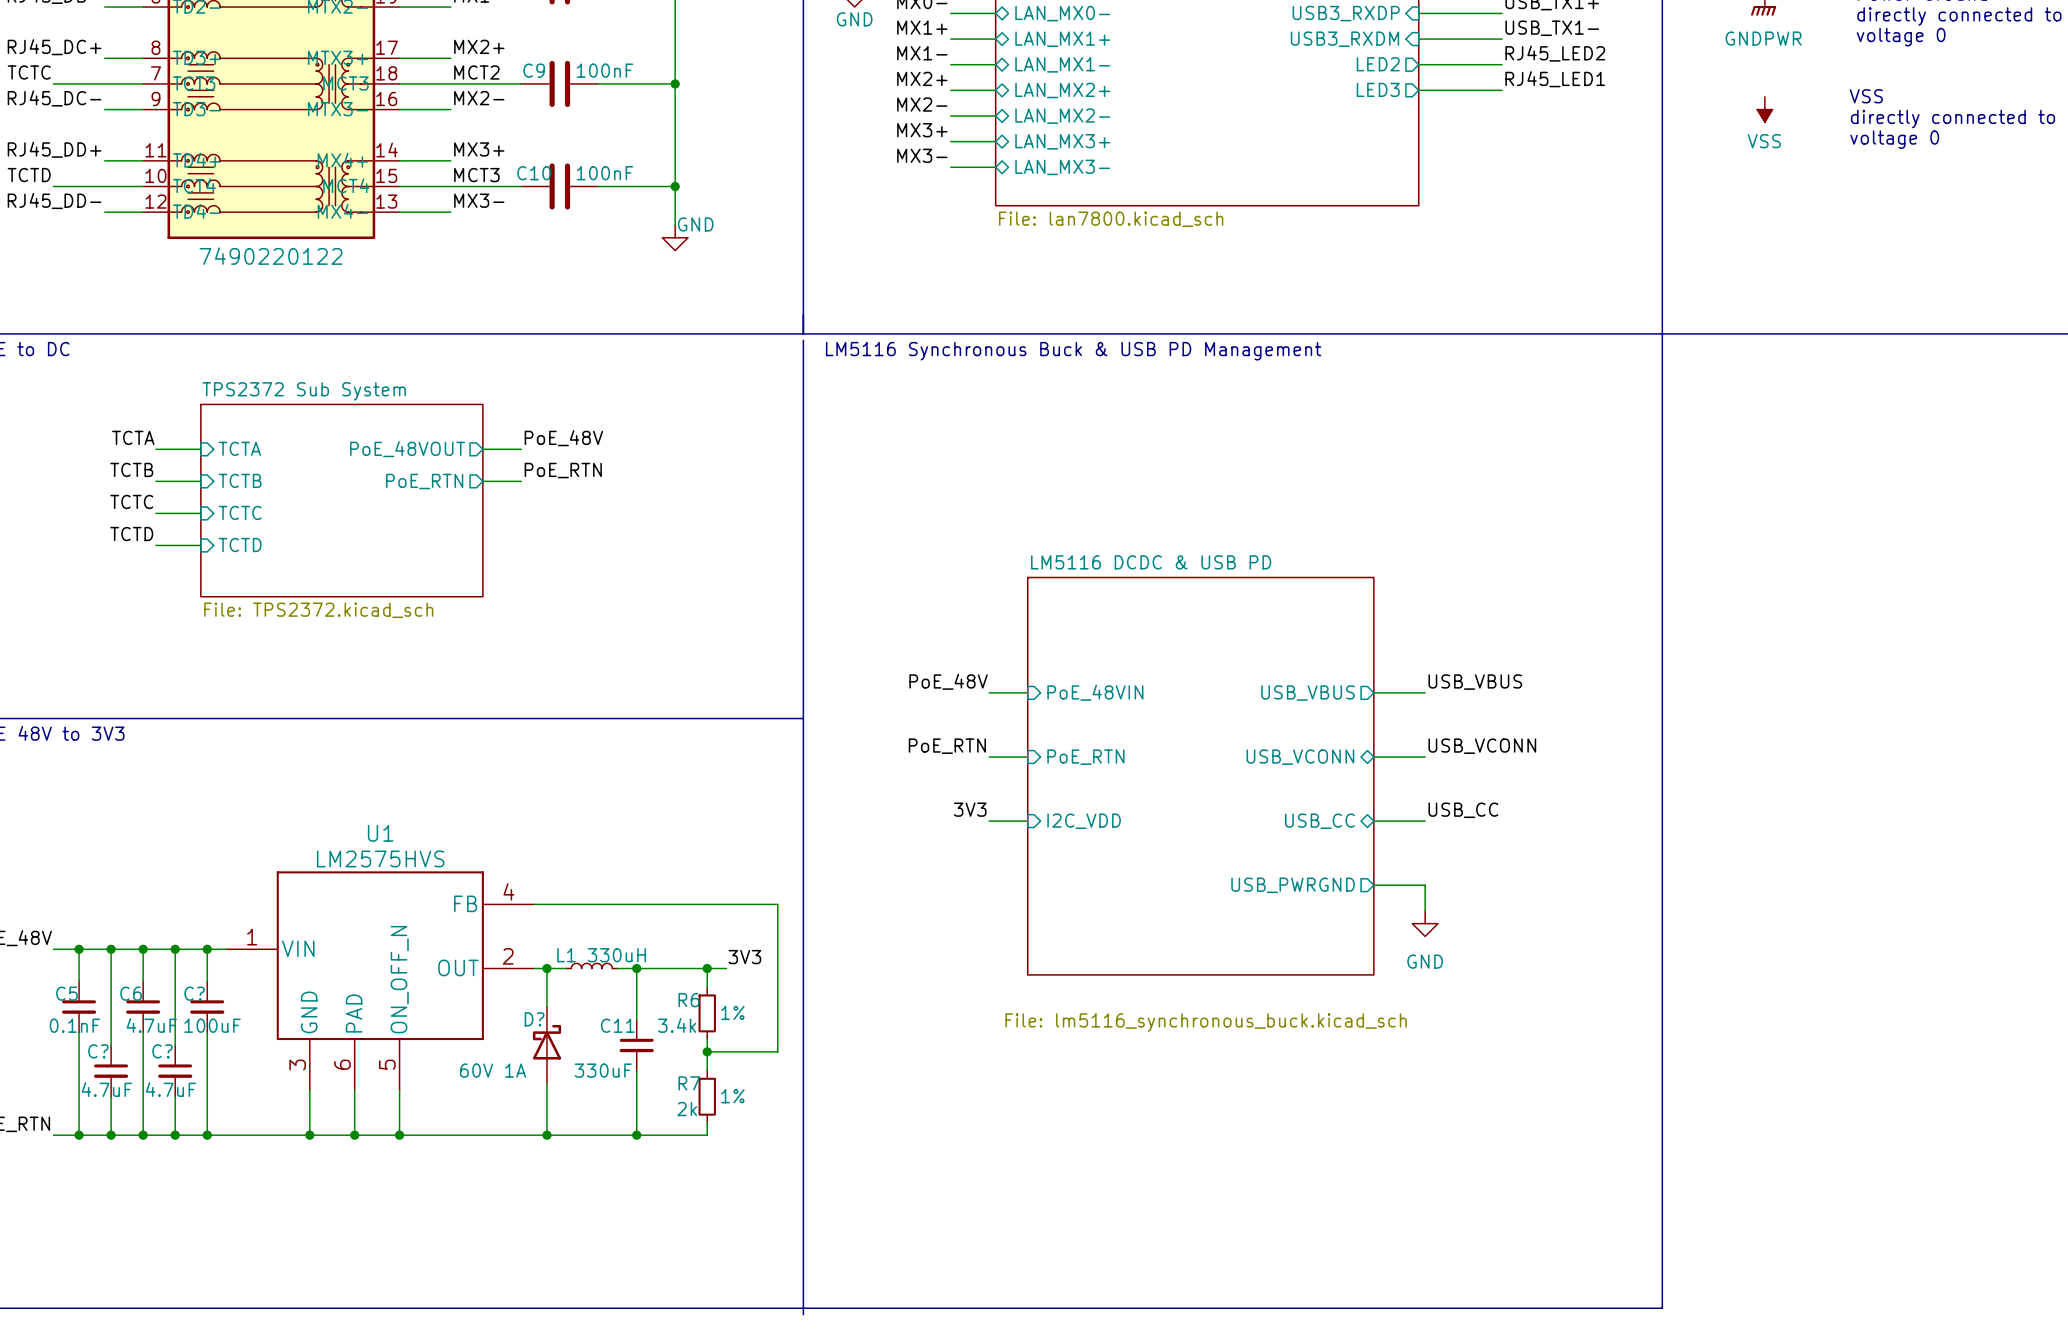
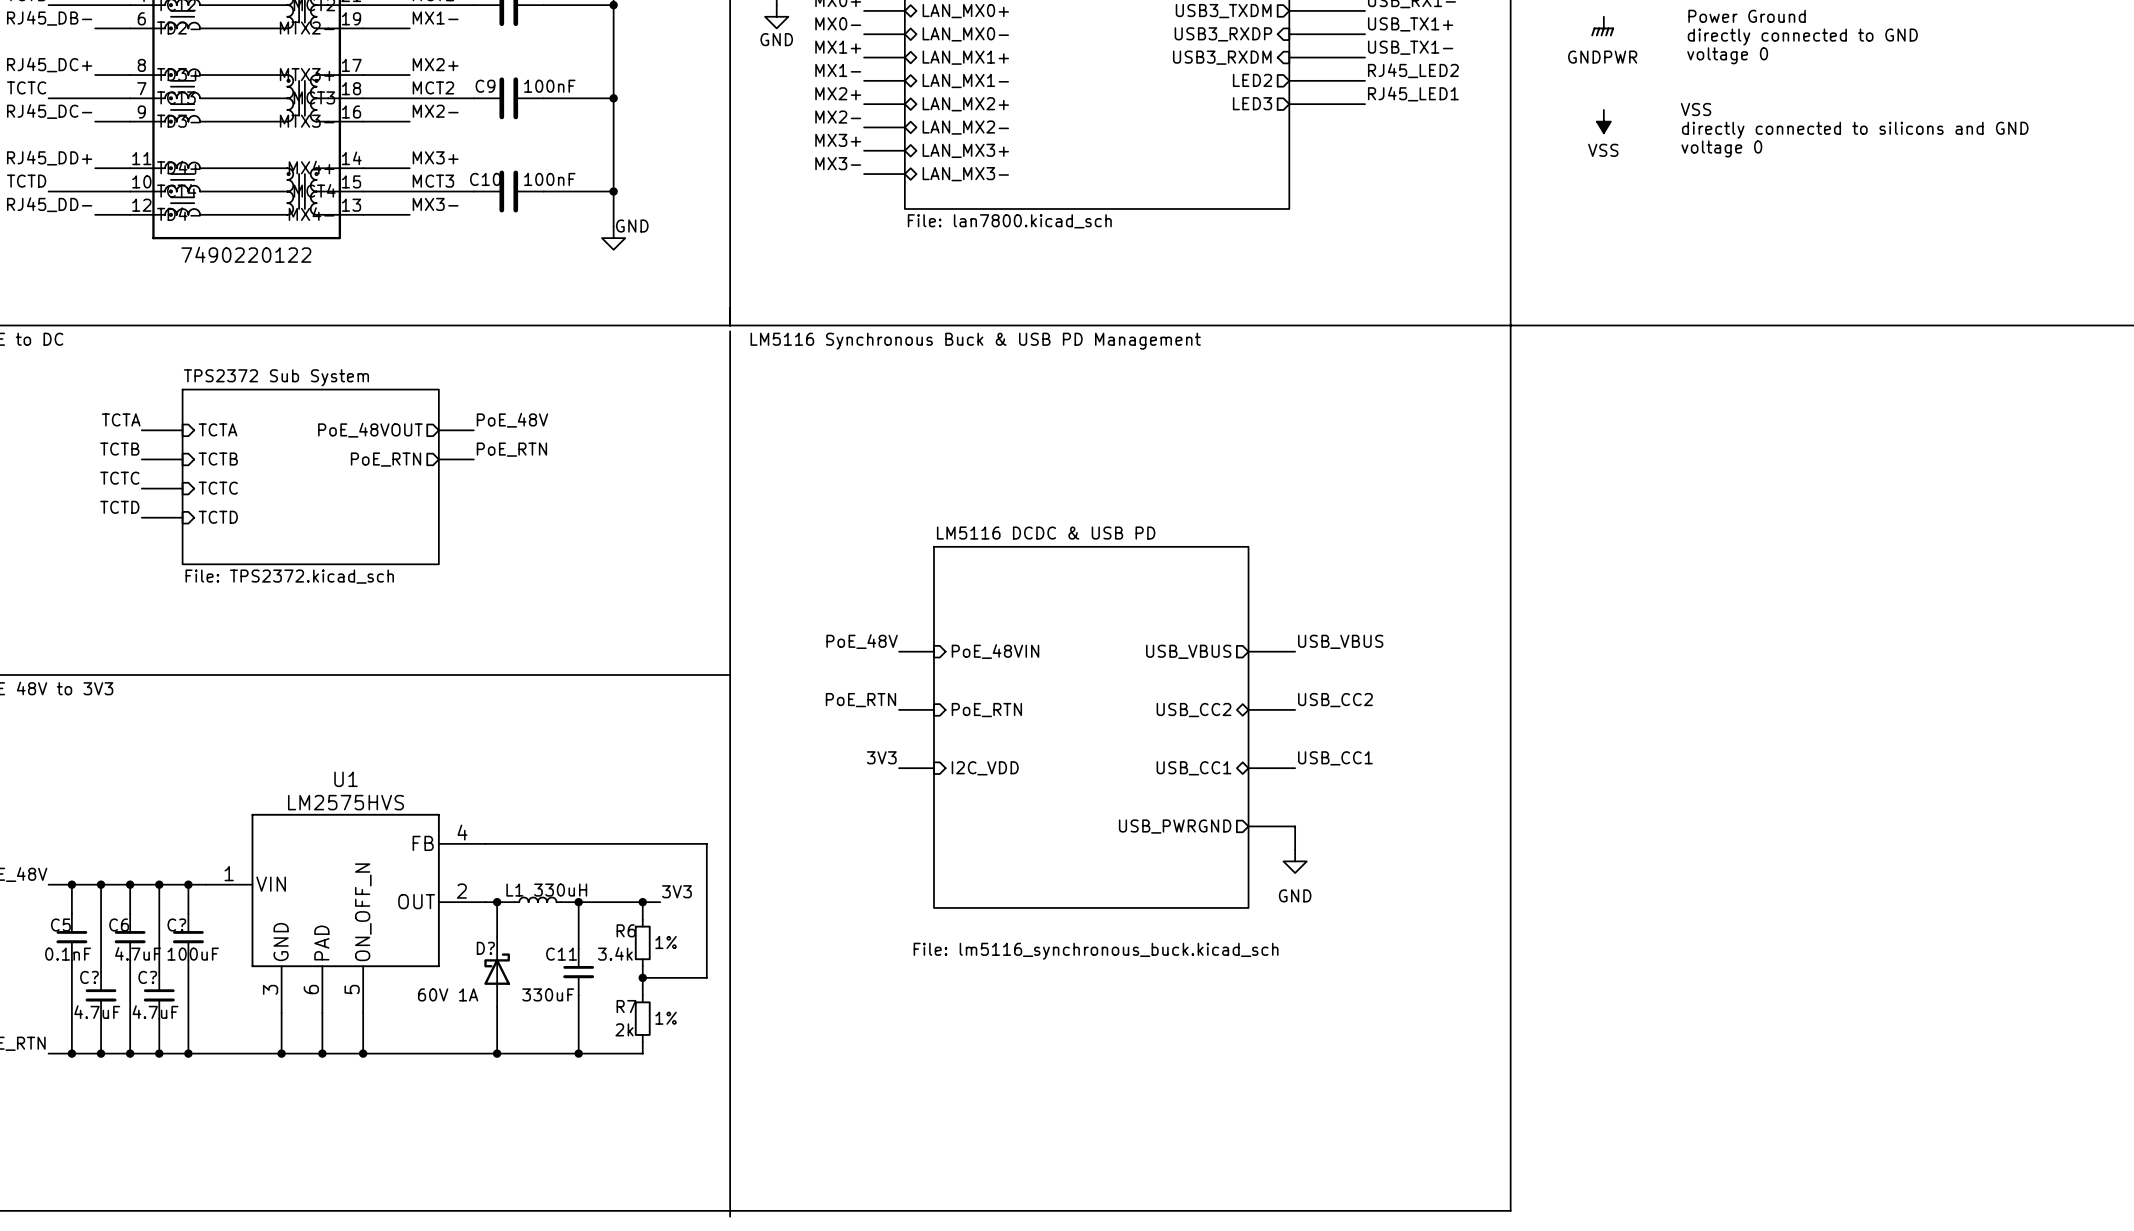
label: USB_VCONN (1482, 746) -> USB_CC2 (1335, 700)
sheet pin: USB_VCONN (1300, 757) -> USB_CC2 (1193, 710)
label: USB_CC (1463, 810) -> USB_CC1 (1335, 758)
sheet pin: USB_CC (1319, 821) -> USB_CC1 (1193, 768)

